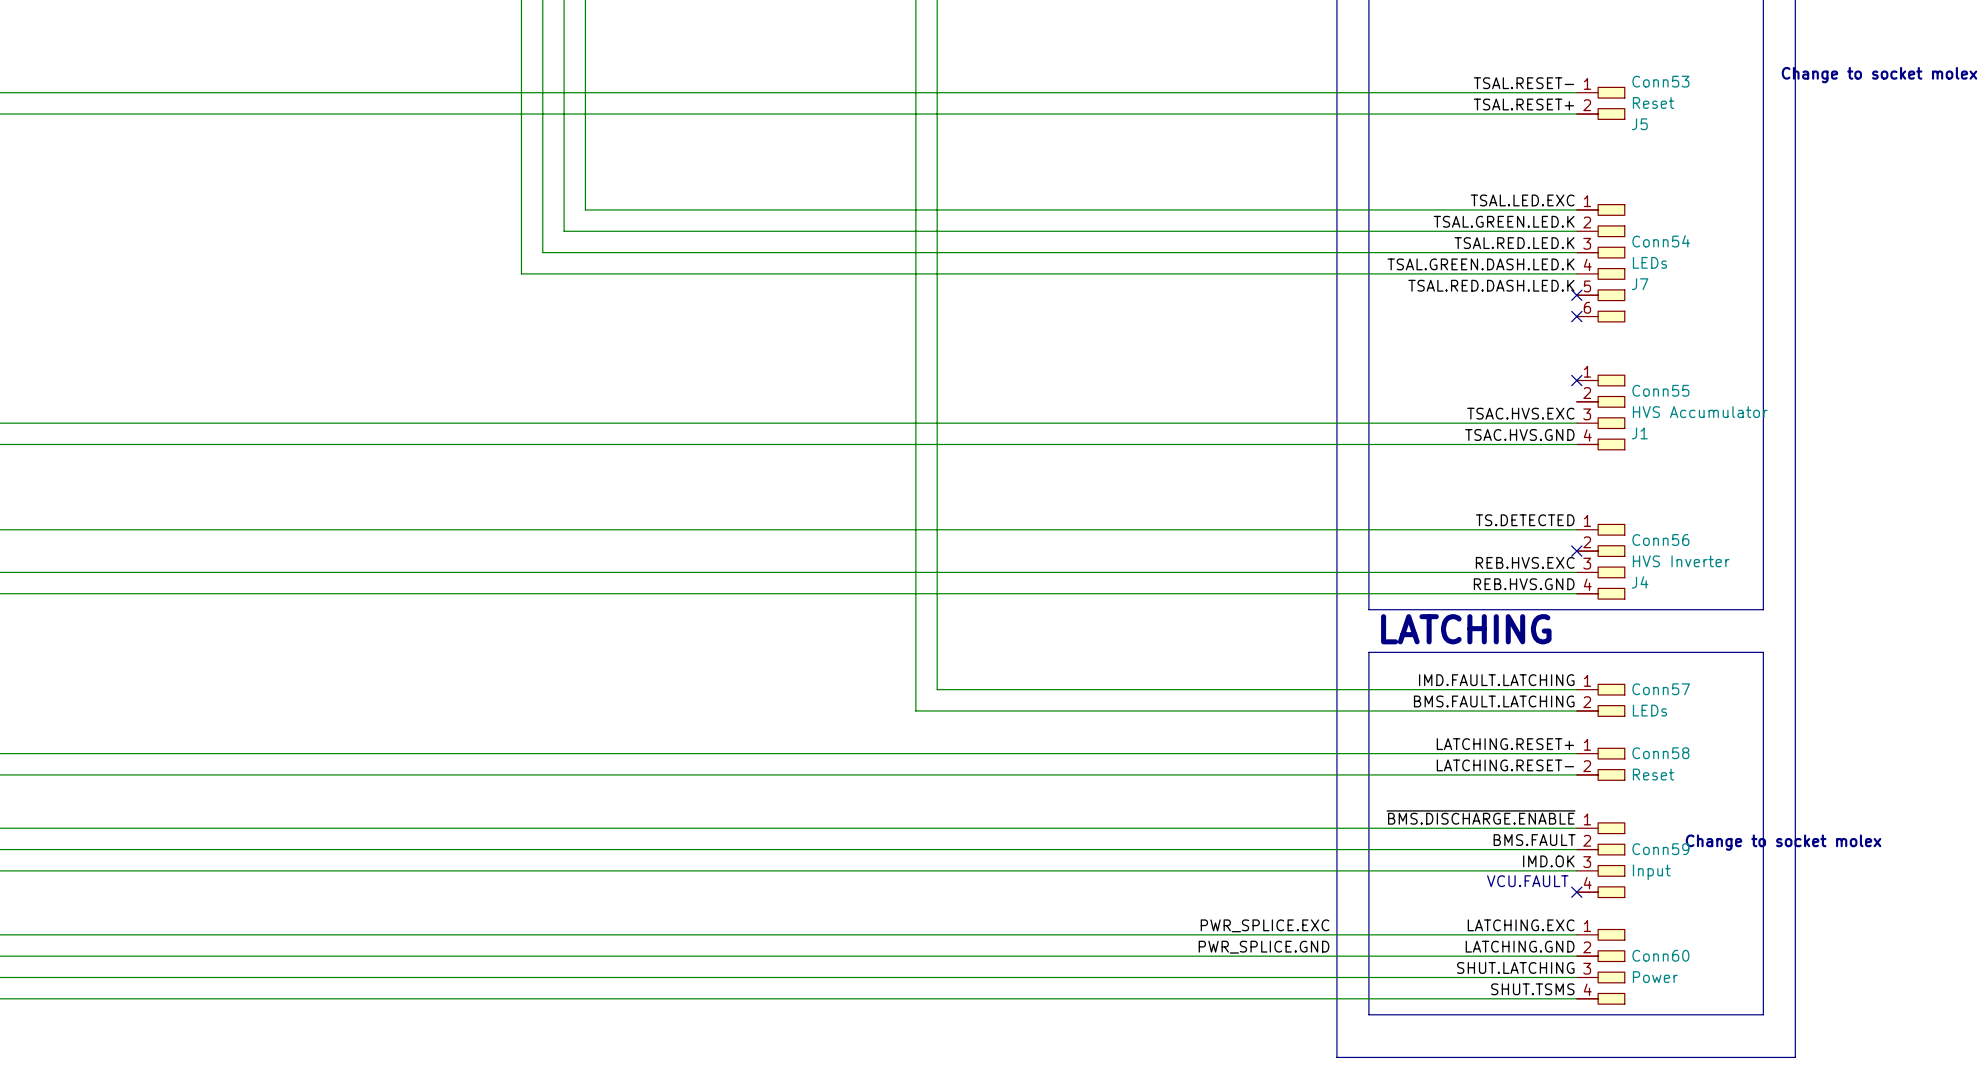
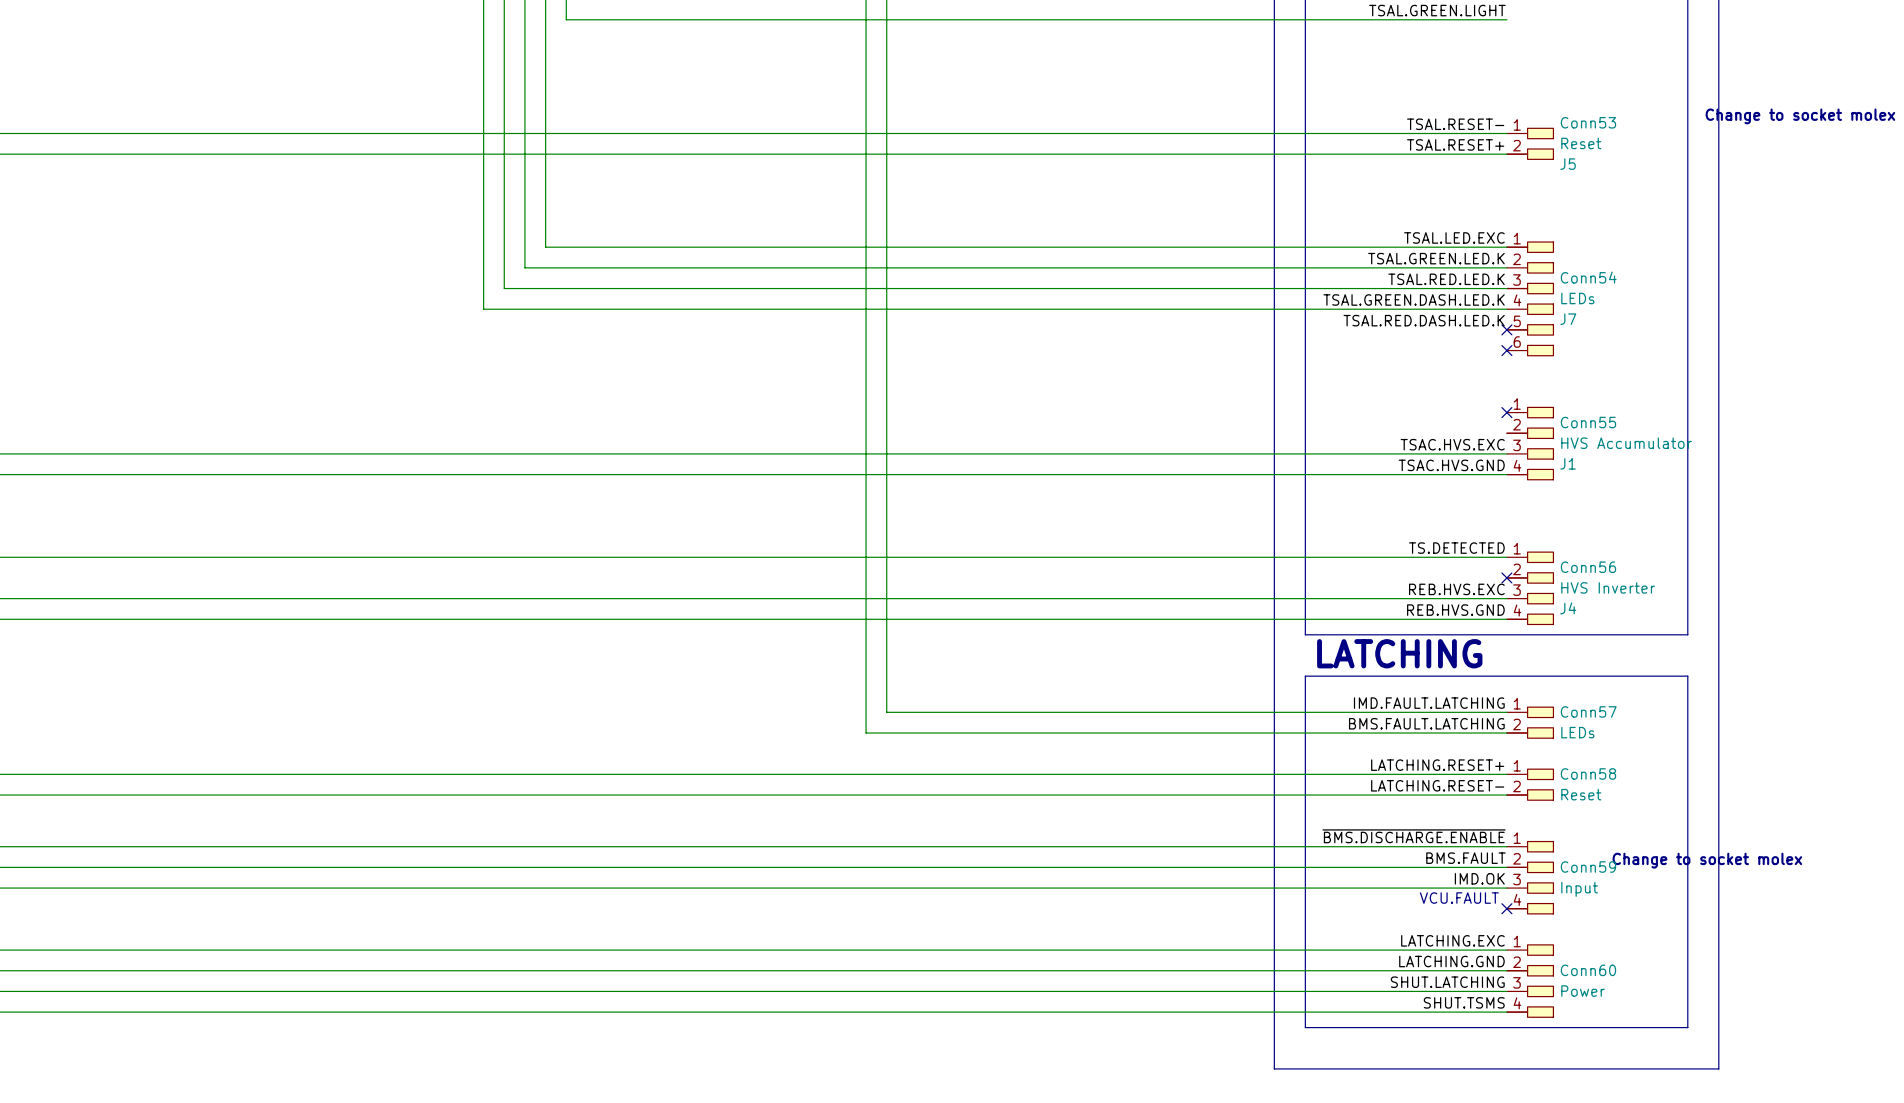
label: PWR_SPLICE.EXC (1265, 925) -> none
label: PWR_SPLICE.GND (1264, 947) -> none

